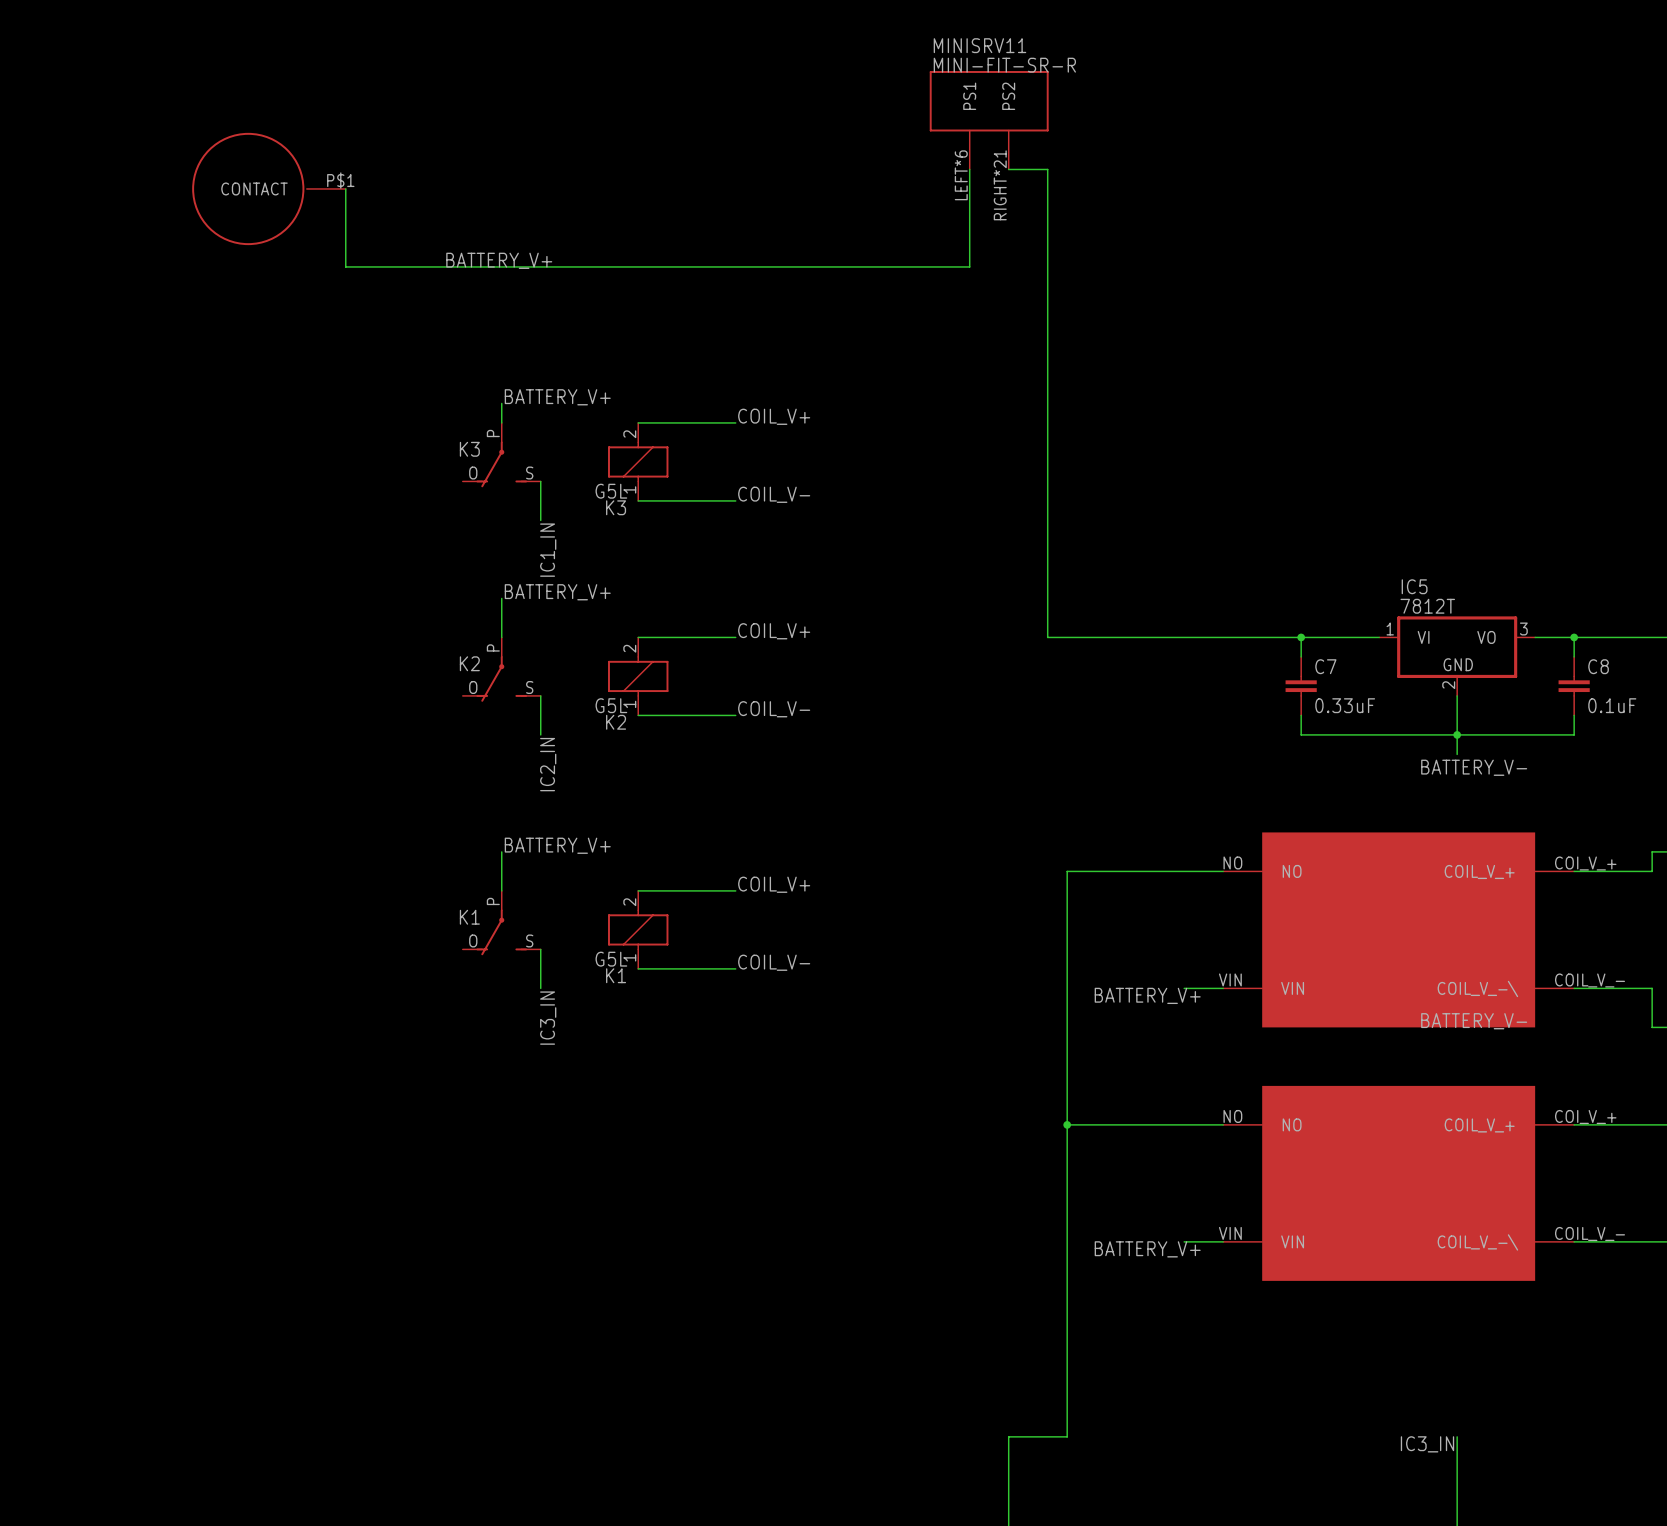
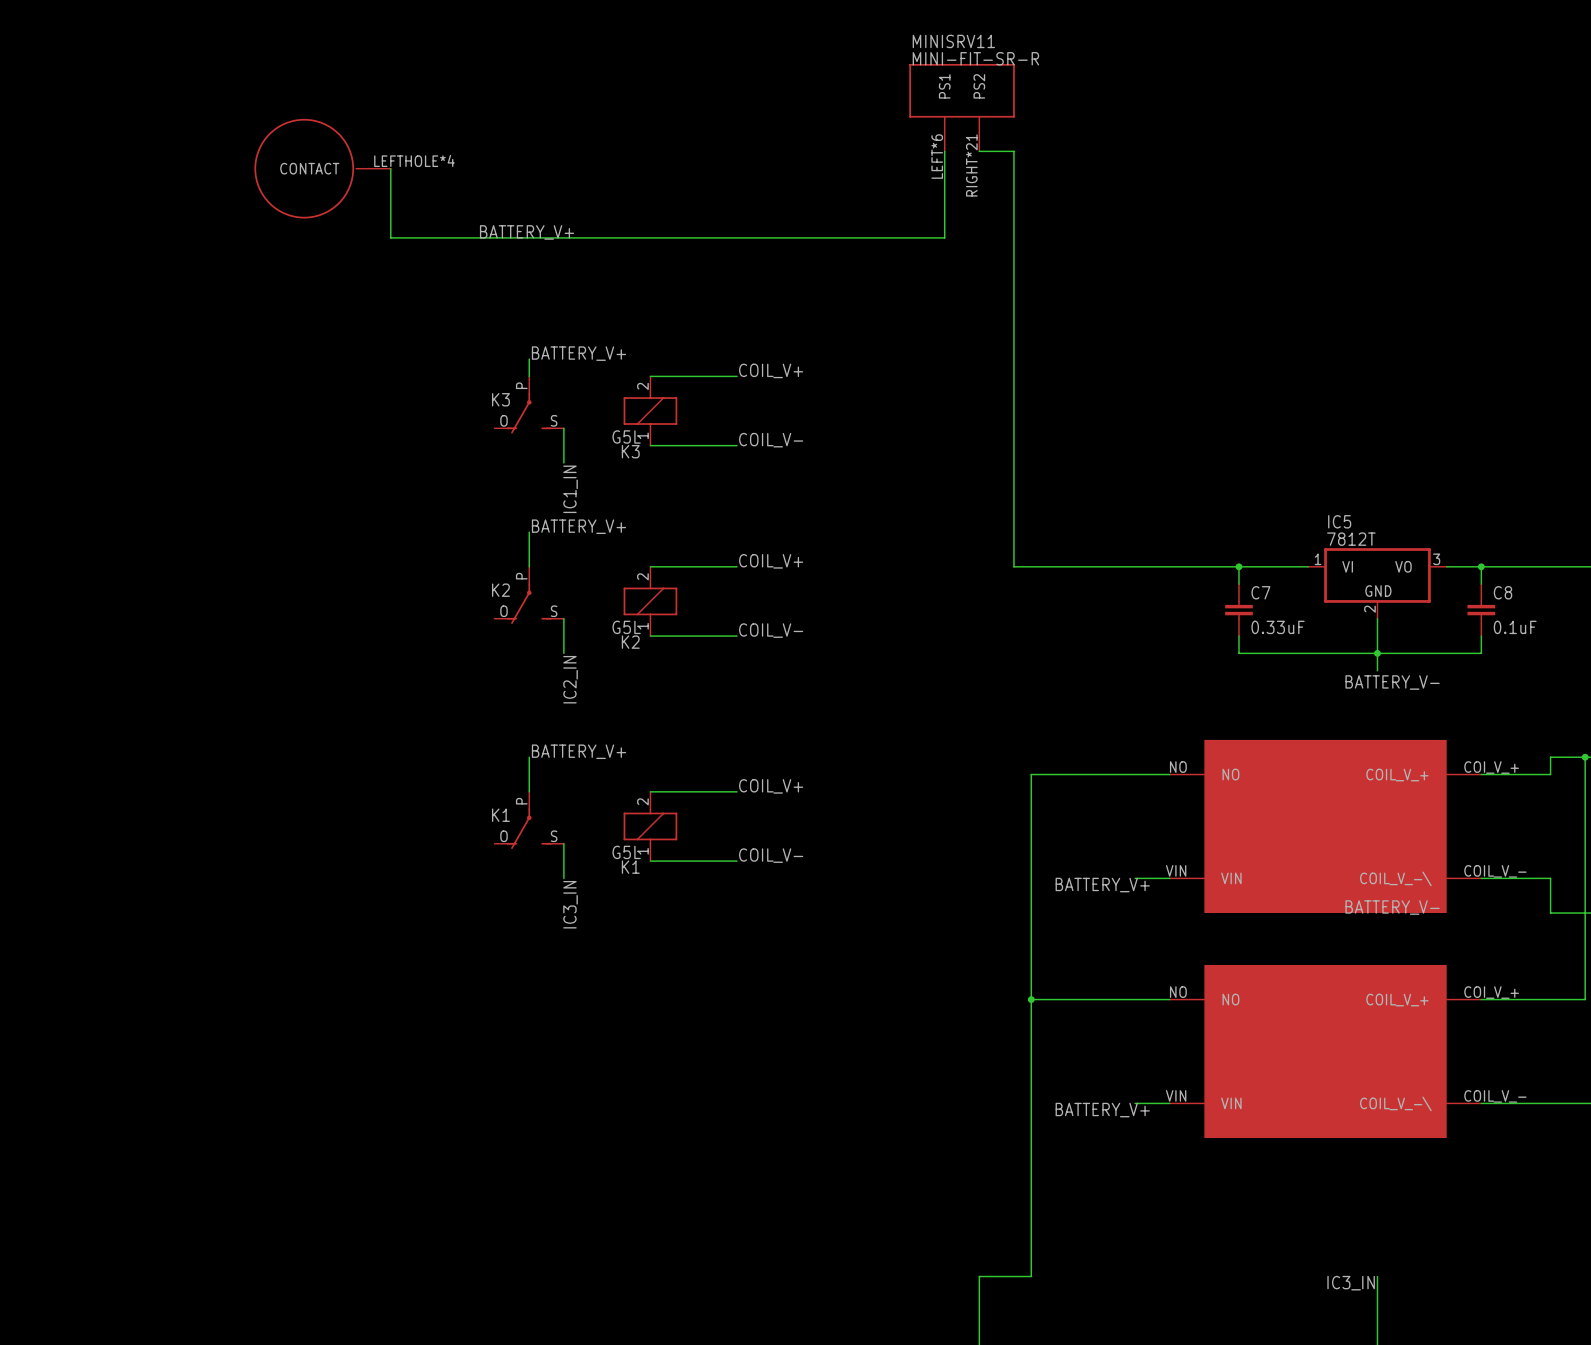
part pin number: P$1 (340, 180) -> LEFTHOLE*4 (414, 160)

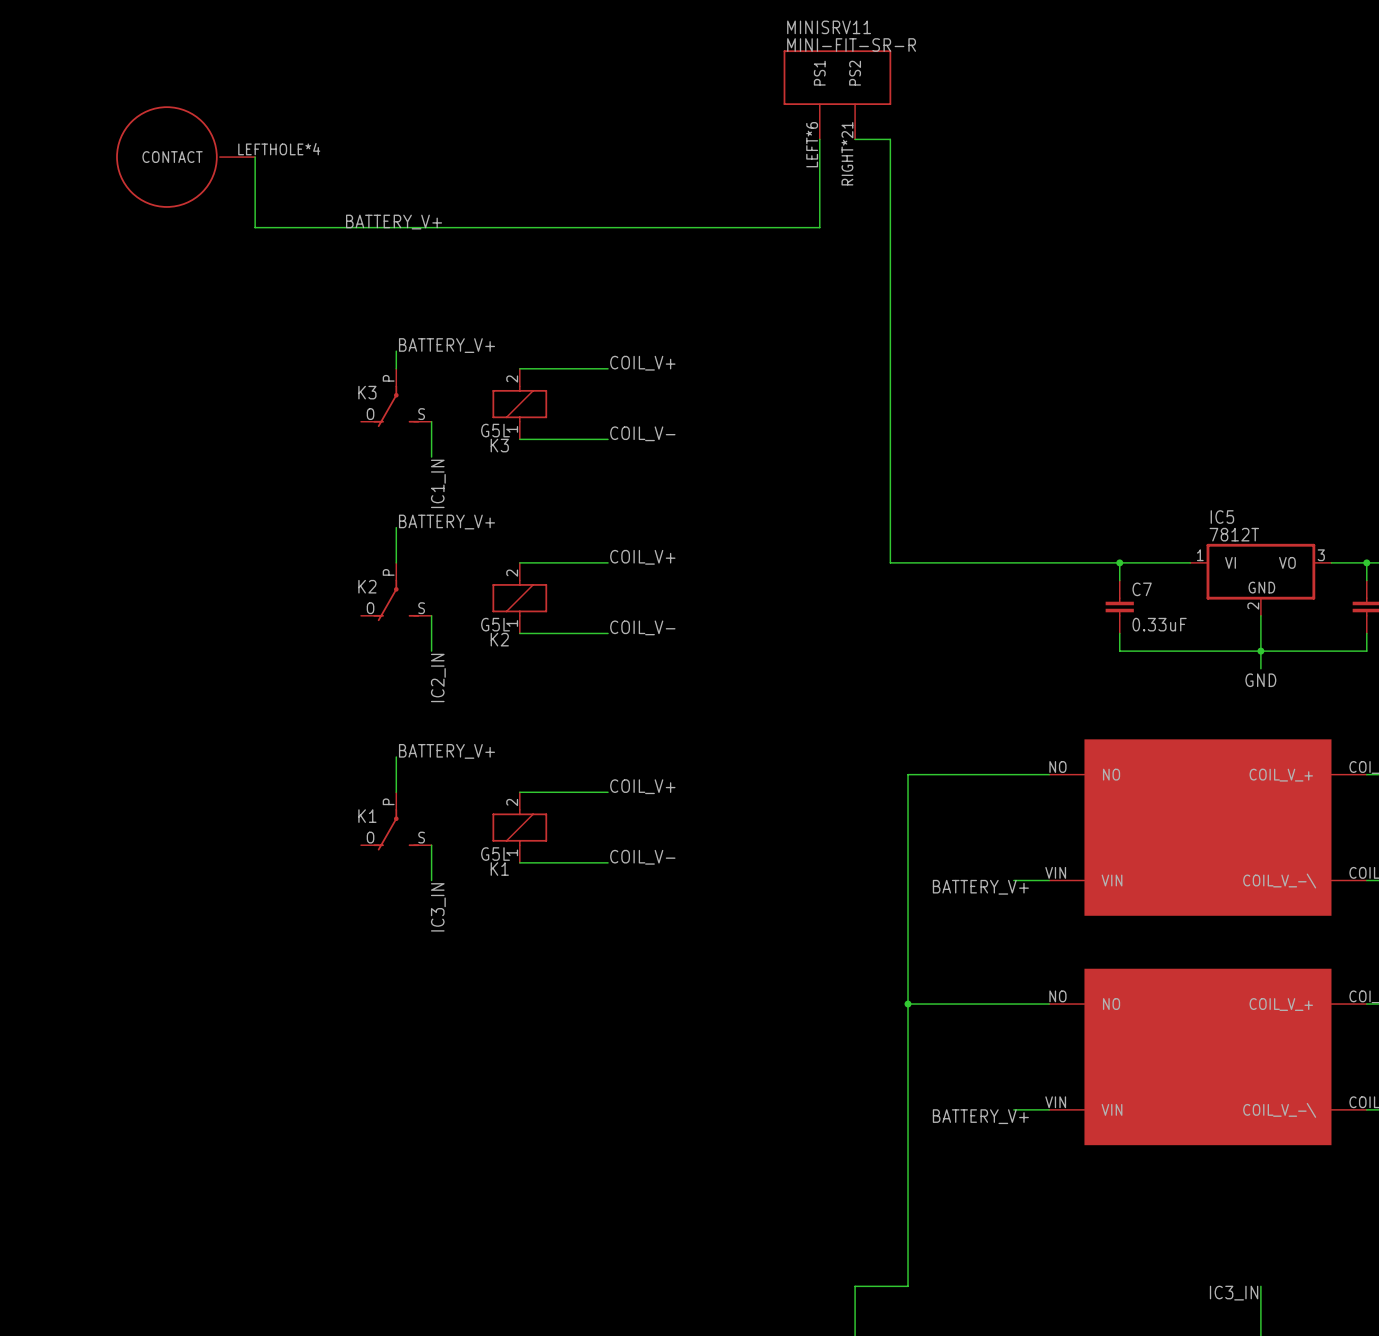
label: none -> GND (1260, 680)
label: BATTERY_V- (1392, 682) -> none
label: BATTERY_V- (1392, 907) -> none

